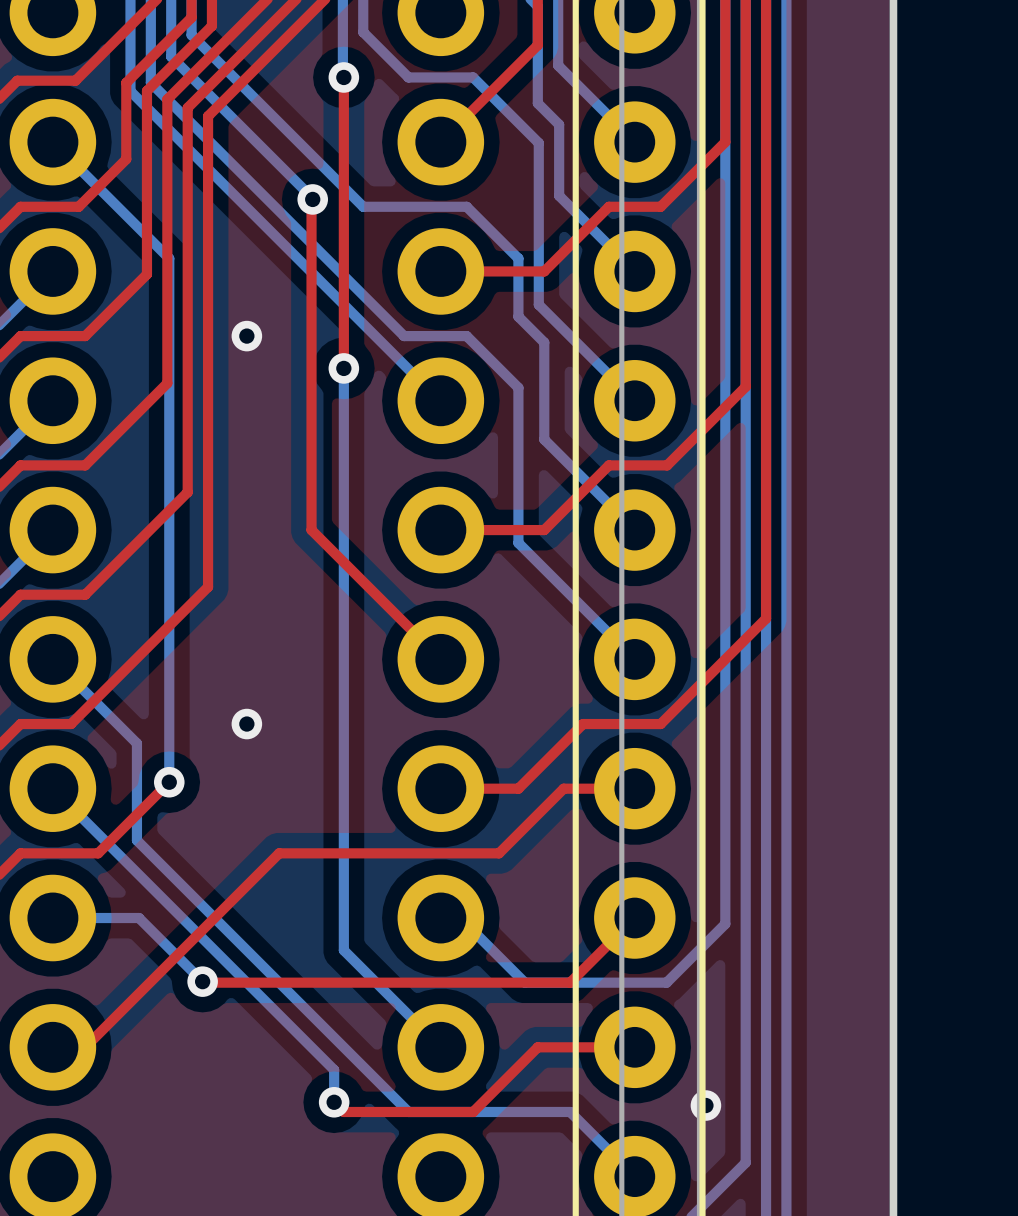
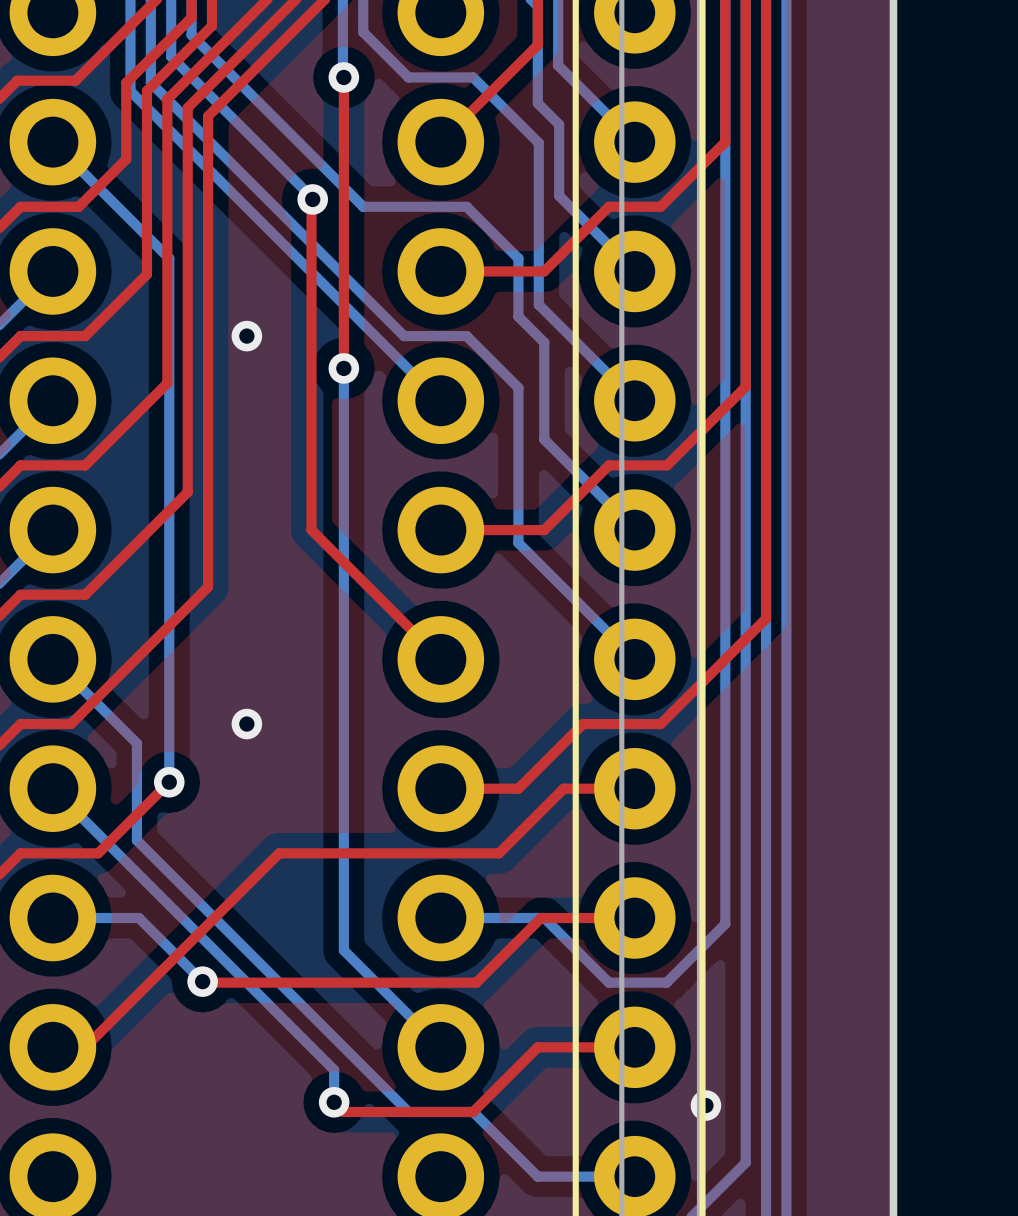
bottom track: (460, 918) (524, 982) (608, 982) -> (460, 918) (544, 918) (608, 982)
top track: (634, 918) (570, 982) (476, 982) -> (634, 918) (541, 918) (476, 982)
bottom track: (473, 1111) (570, 1111) (634, 1176) -> (473, 1111) (537, 1176) (634, 1176)

